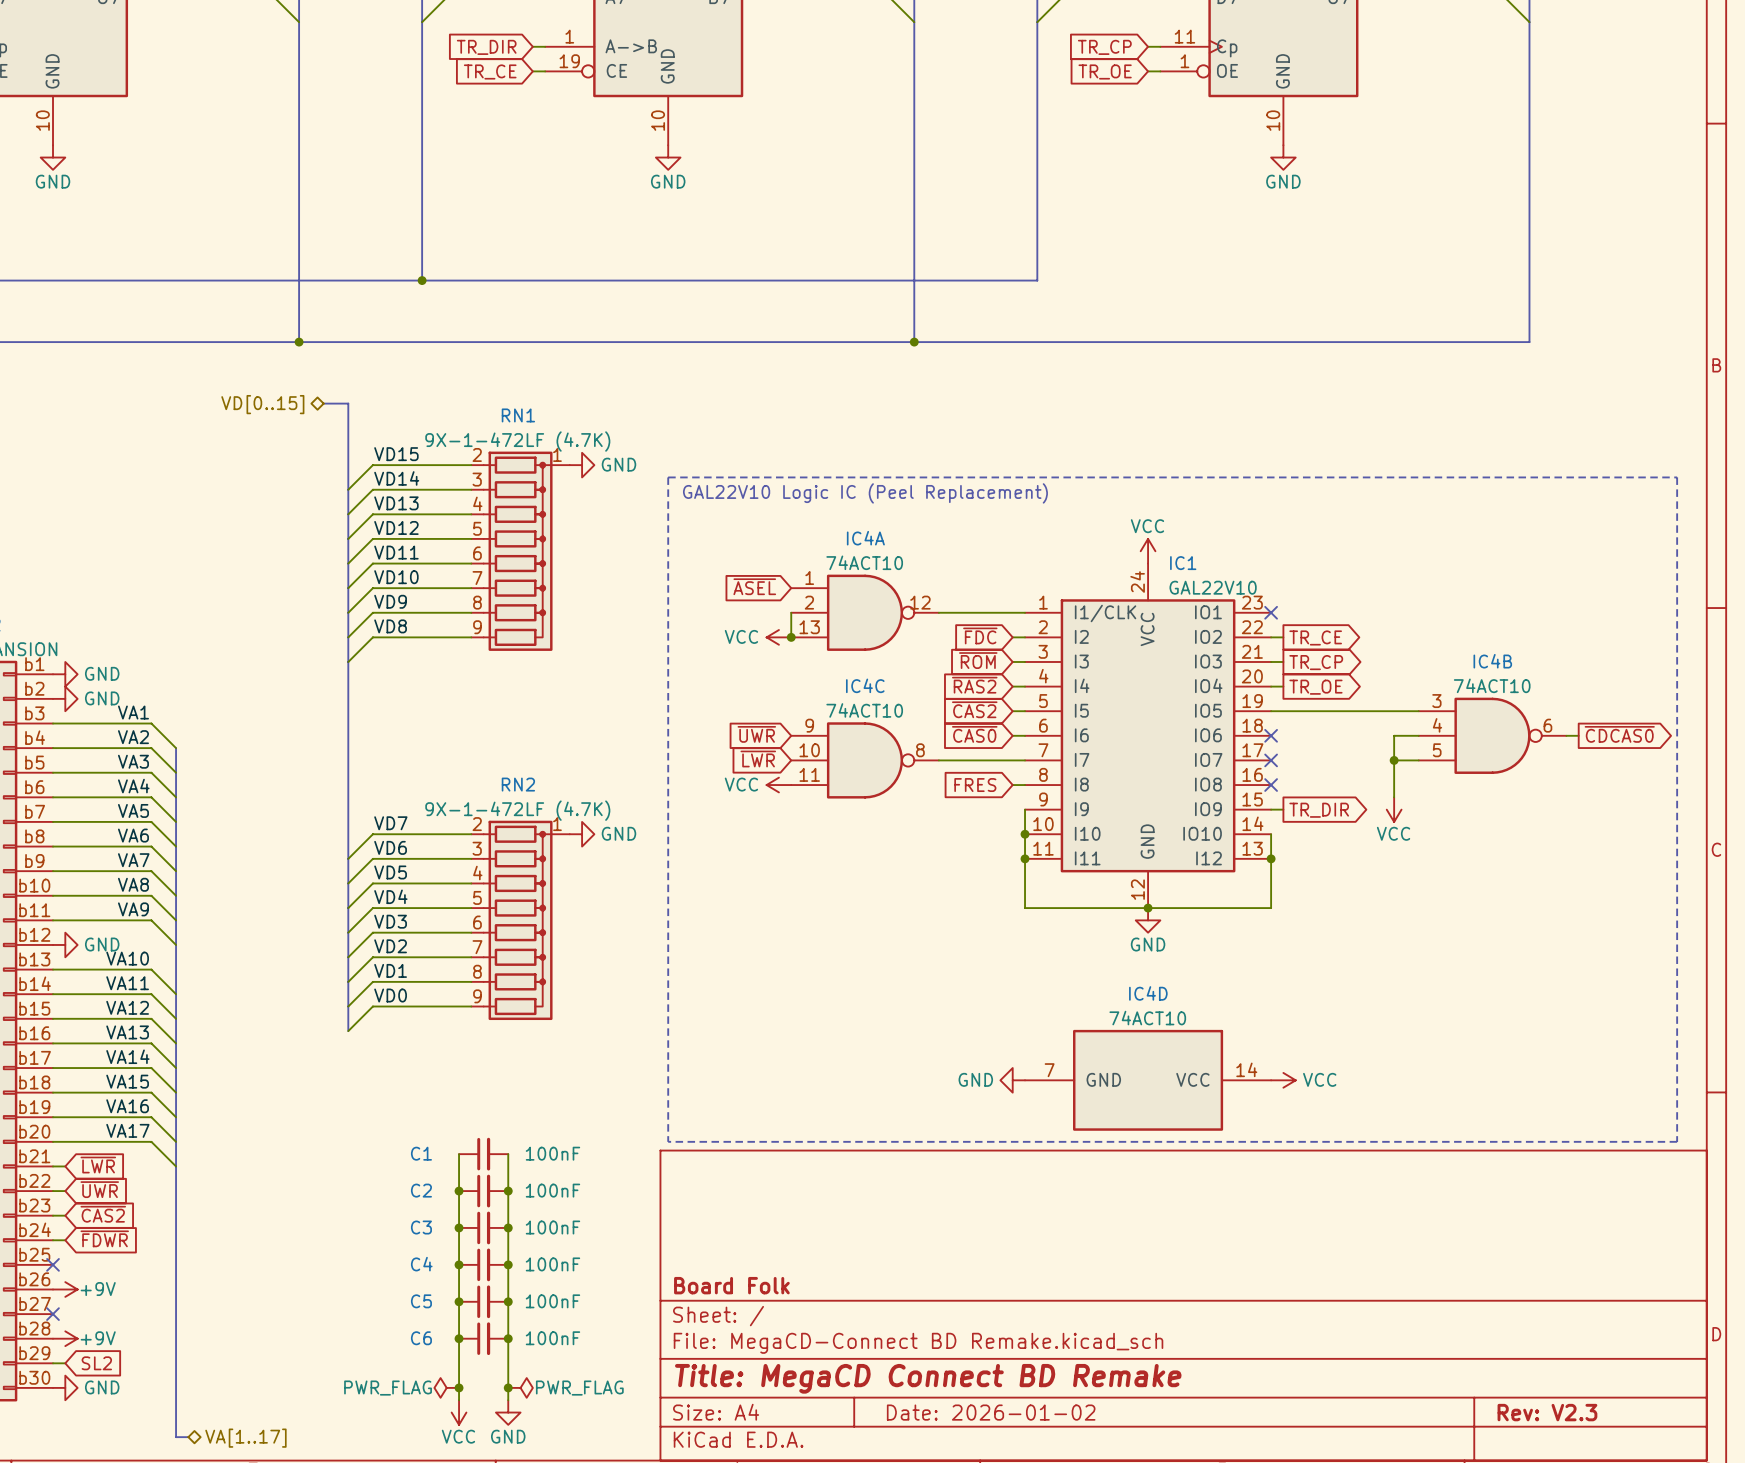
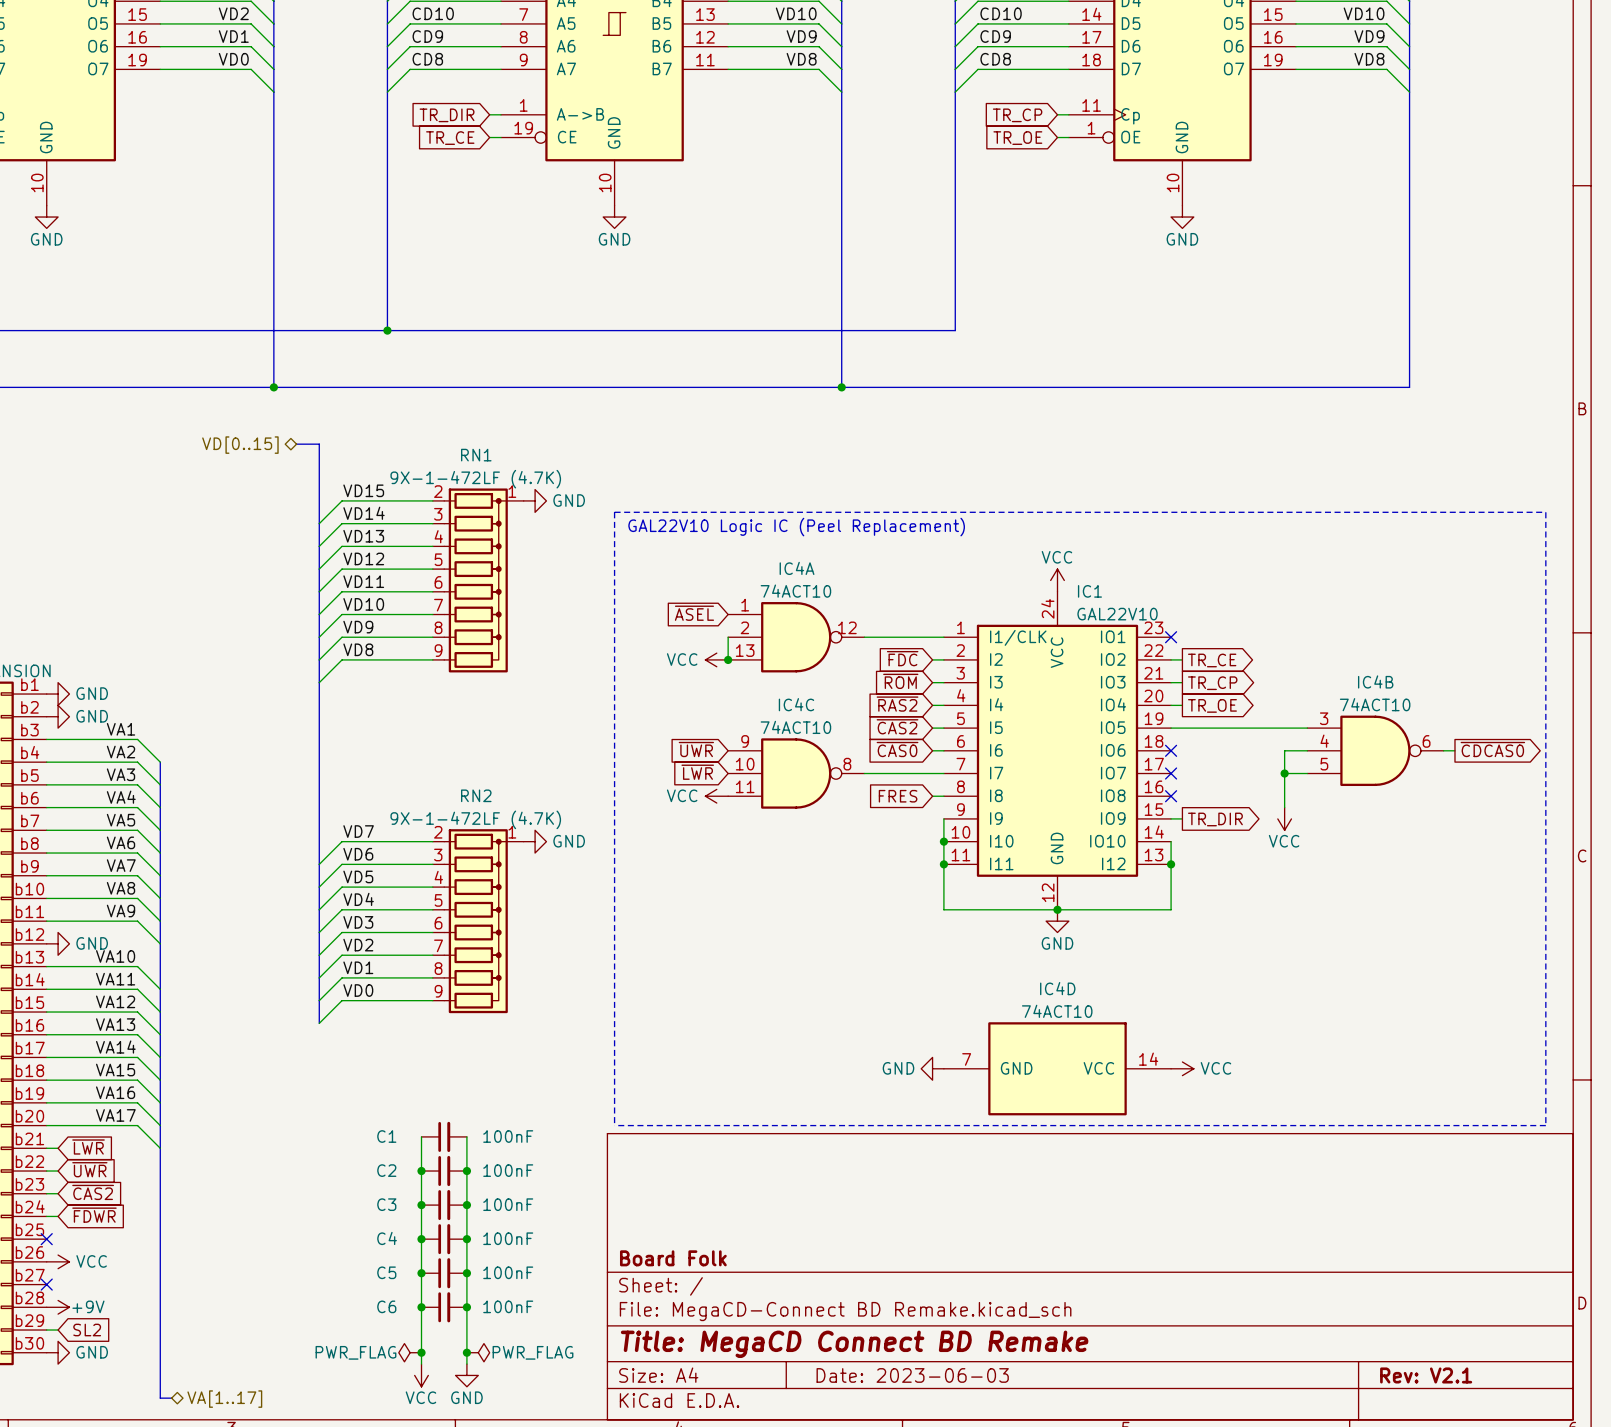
power symbol: +9V (65, 1289) -> VCC (58, 1261)
title block: Date: 2026-01-02 (991, 1412) -> Date: 2023-06-03 (912, 1375)
title block: Rev: V2.3 (1547, 1412) -> Rev: V2.1 (1426, 1375)

